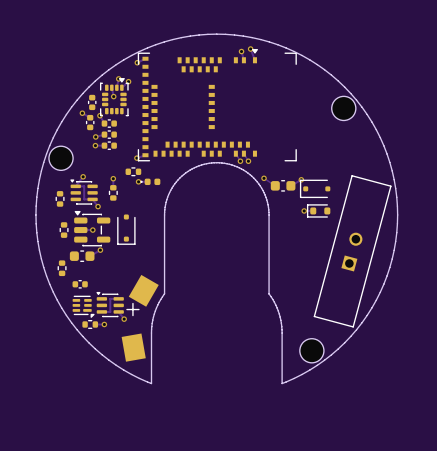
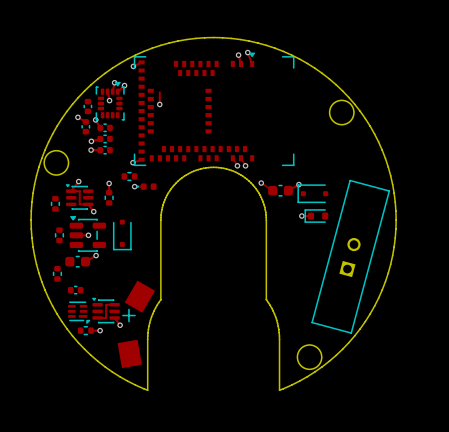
track: none -> (159, 92) (159, 104)
via: none -> (159, 104)

